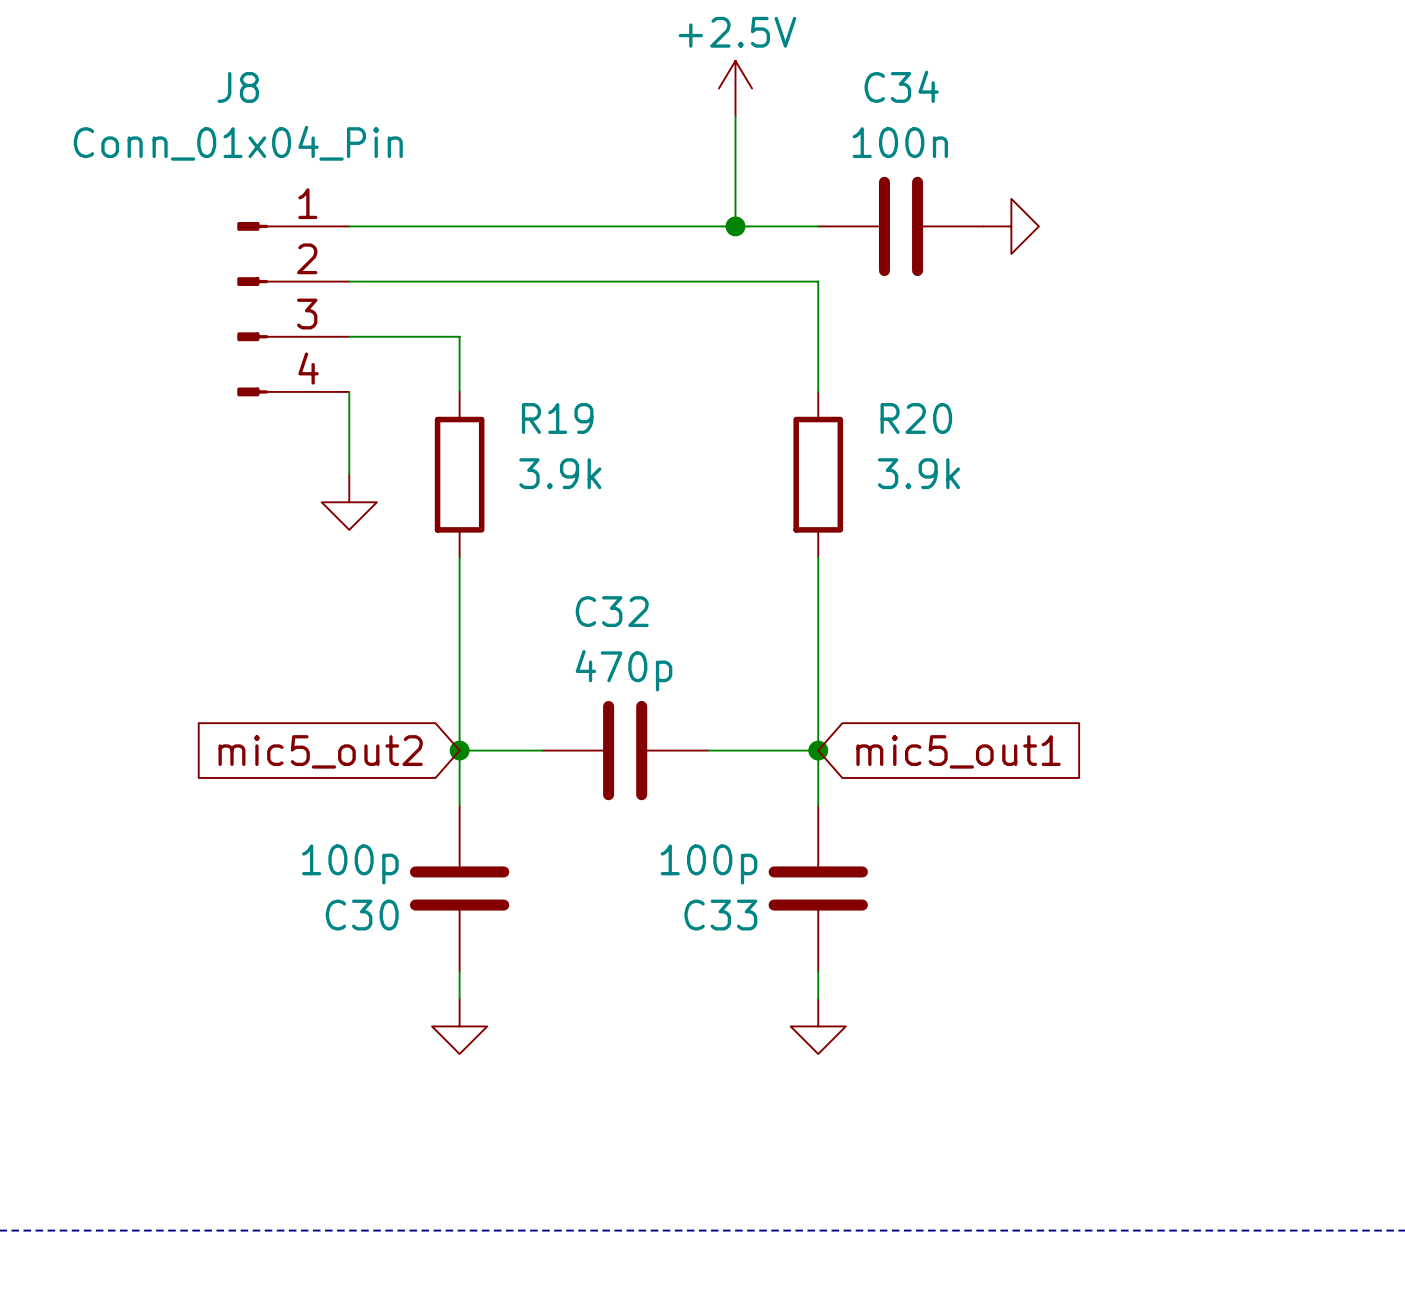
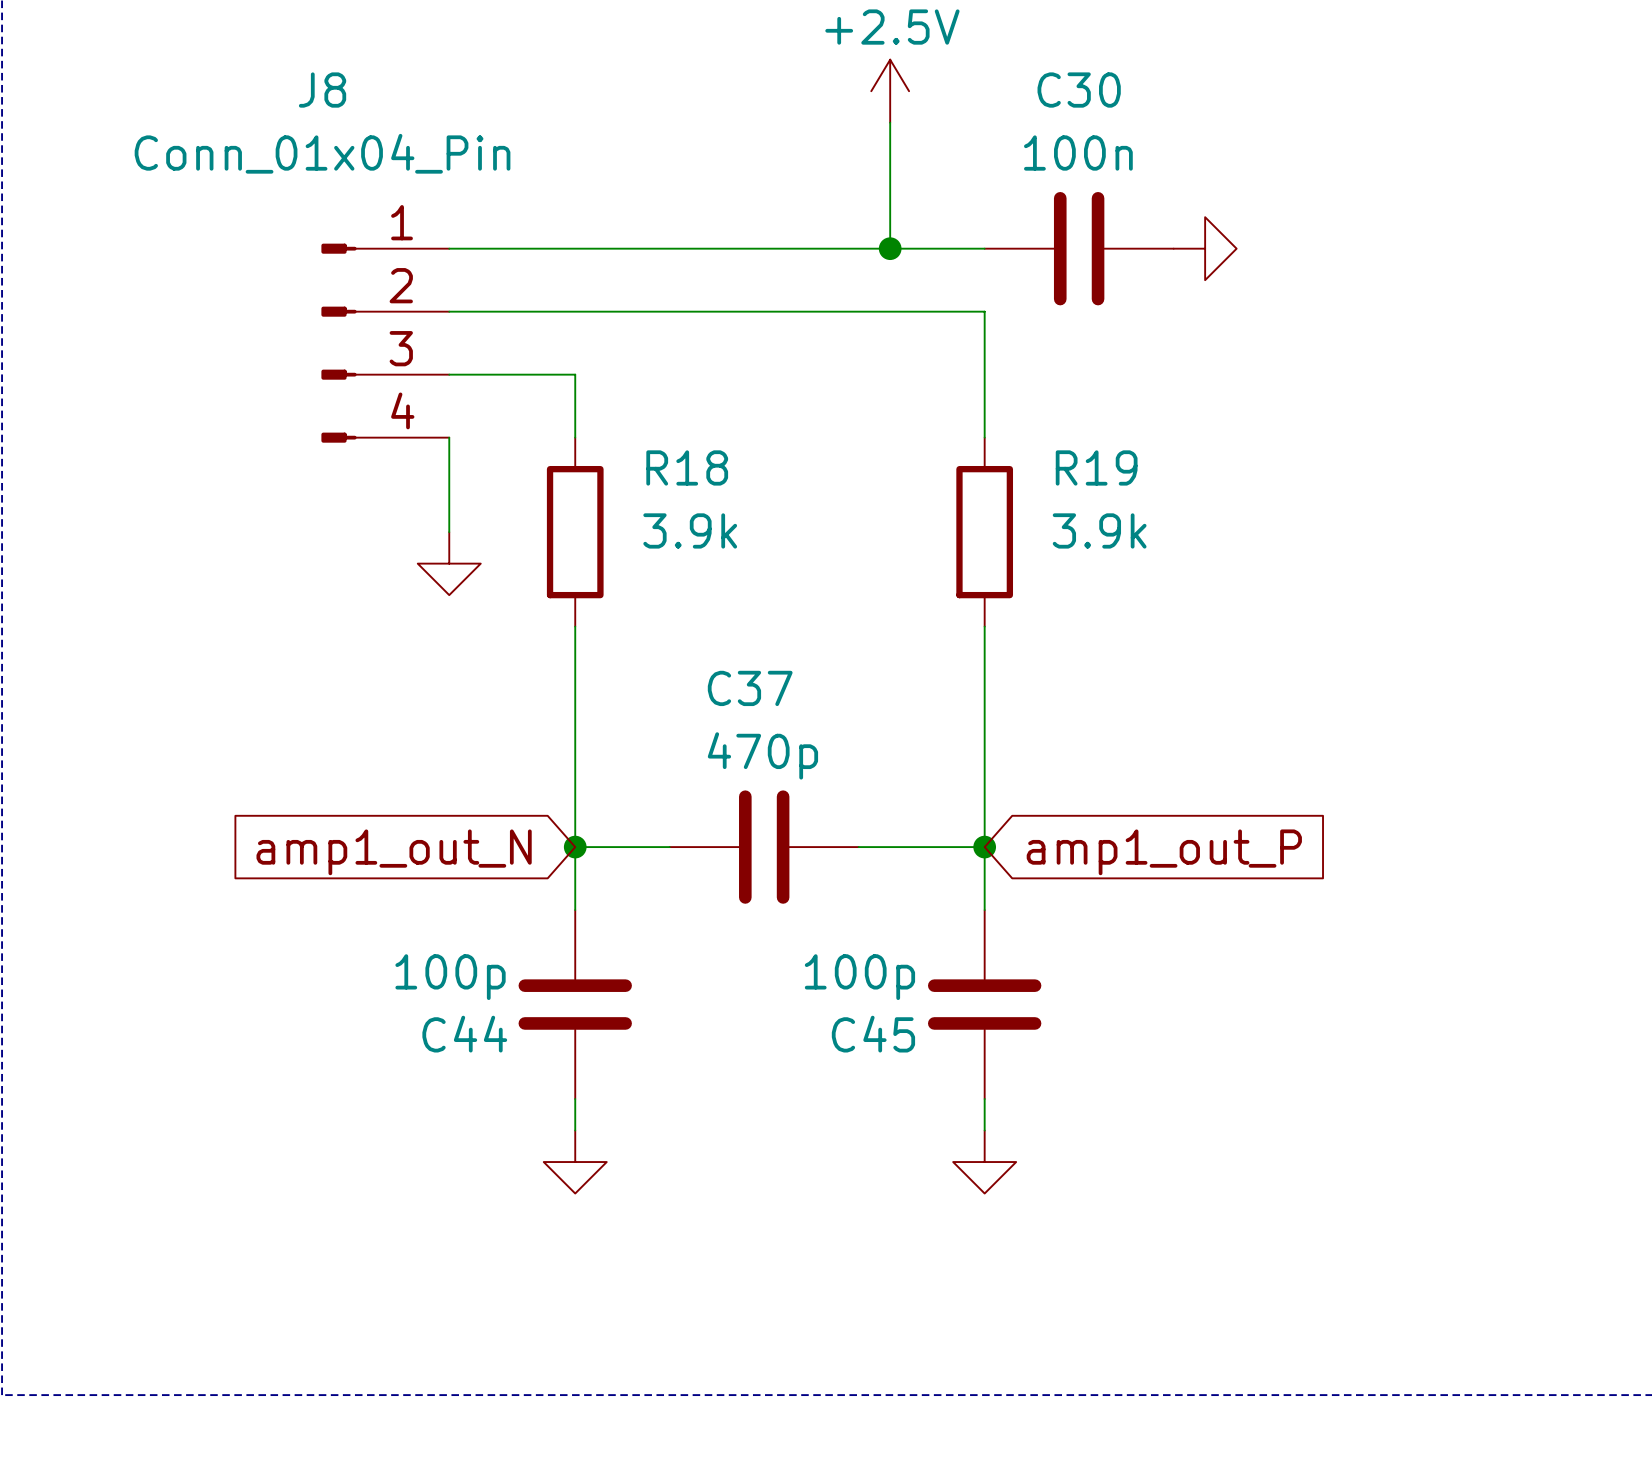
C34 name: C34 (901, 86) -> C30 (1079, 90)
R19 name: R19 (557, 418) -> R18 (687, 467)
R20 name: R20 (916, 418) -> R19 (1096, 467)
C32 name: C32 (612, 611) -> C37 (750, 688)
global label: mic5_out2 (320, 751) -> amp1_out_N (394, 852)
global label: mic5_out1 (958, 751) -> amp1_out_P (1164, 852)
C30 name: C30 (362, 915) -> C44 (464, 1034)
C33 name: C33 (720, 915) -> C45 (873, 1034)

